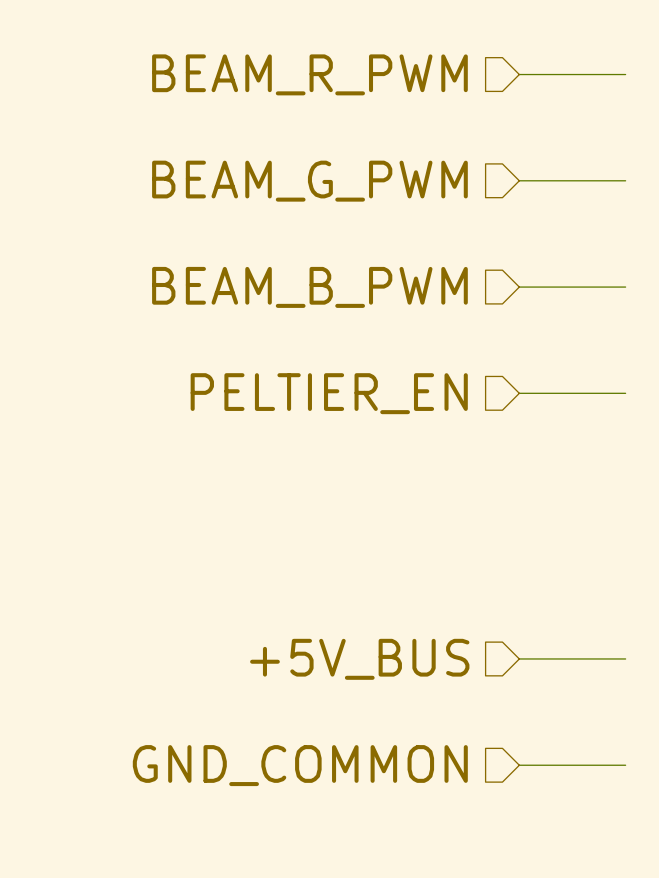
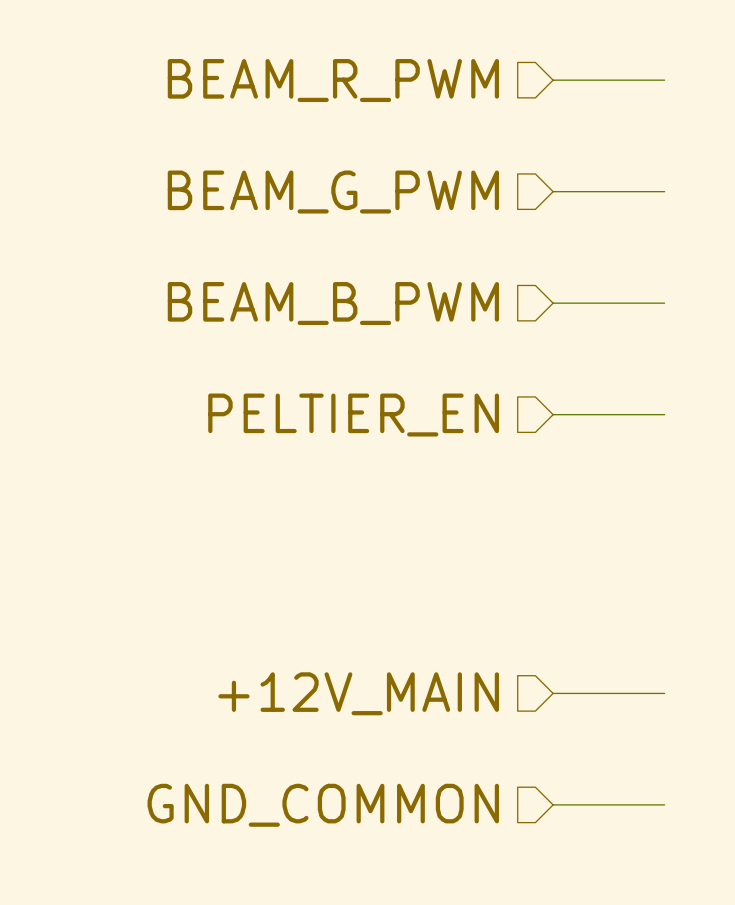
hierarchical label: +5V_BUS (359, 659) -> +12V_MAIN (358, 693)

